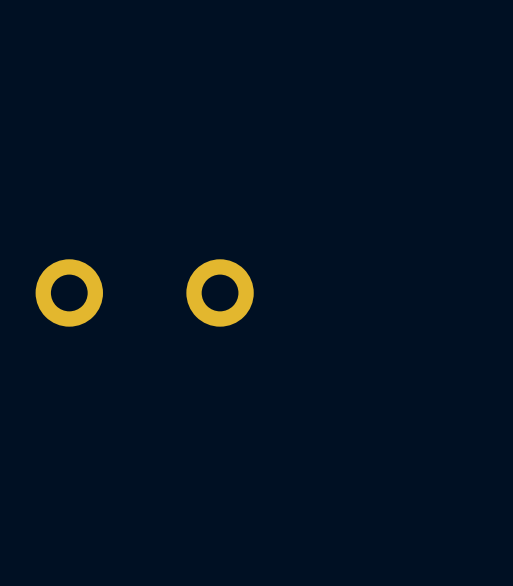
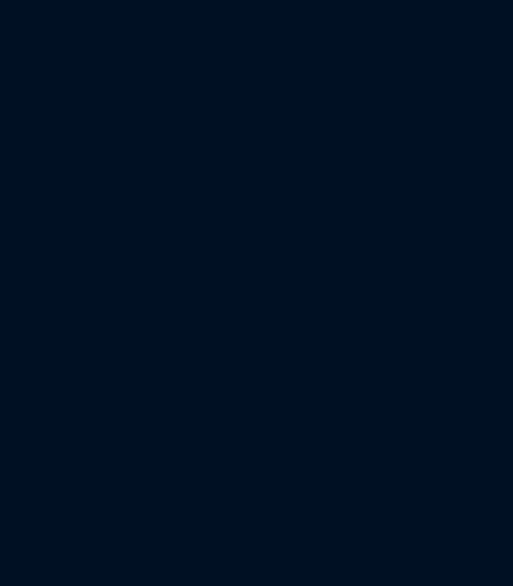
part: (144, 292) -> none

